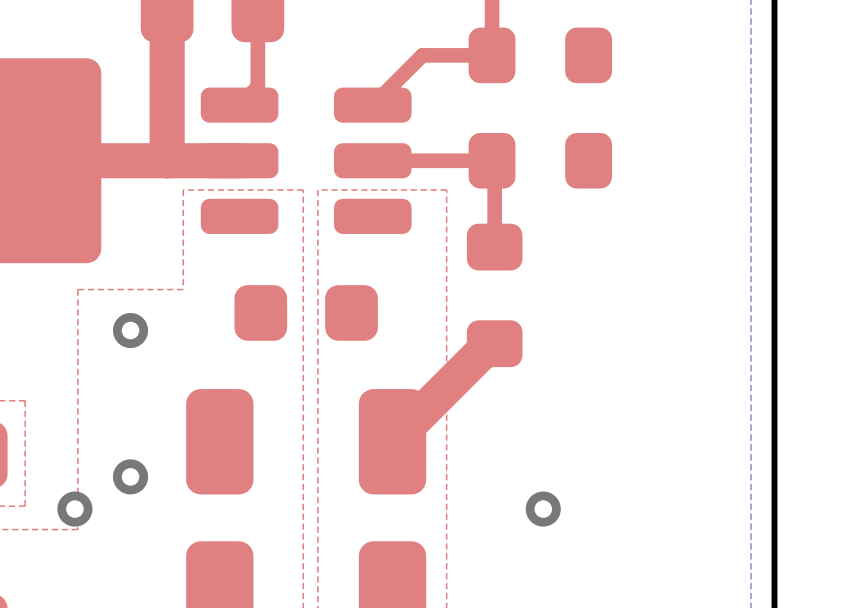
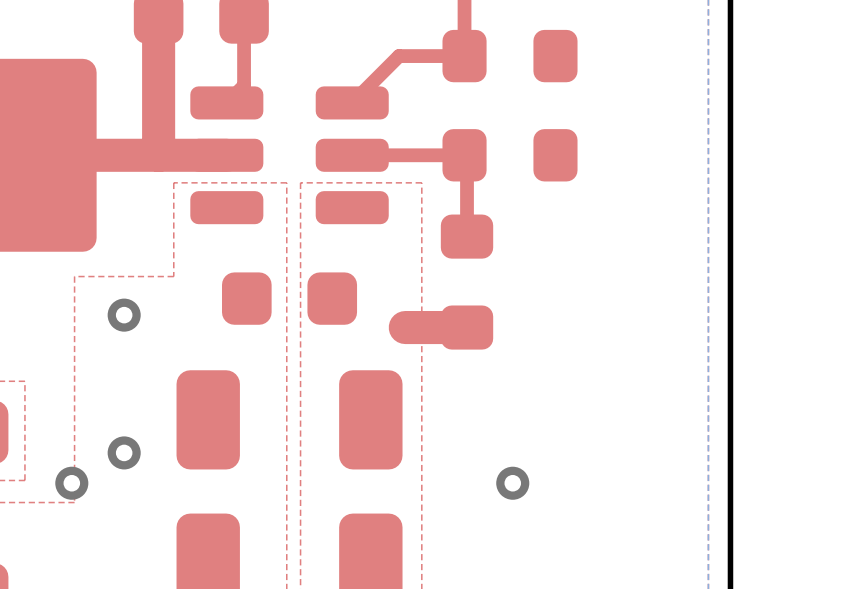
top track: (490, 343) (392, 441) -> (463, 327) (405, 327)

